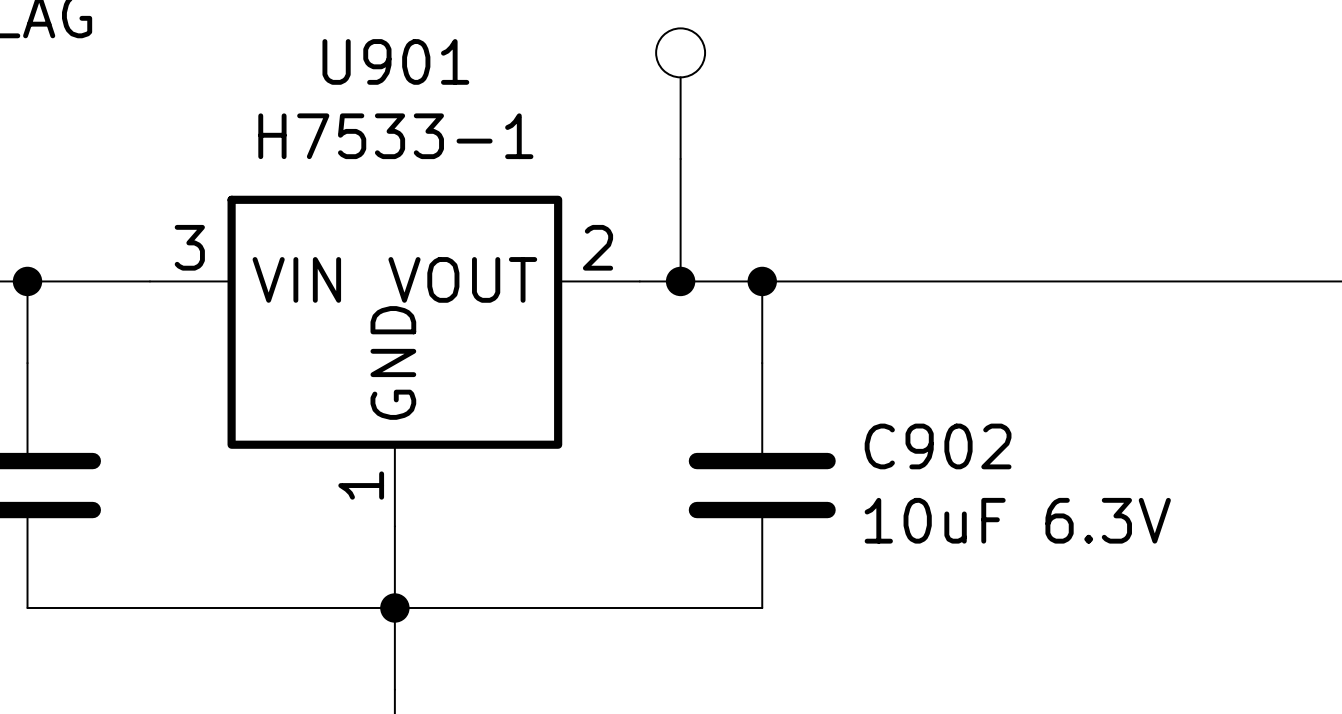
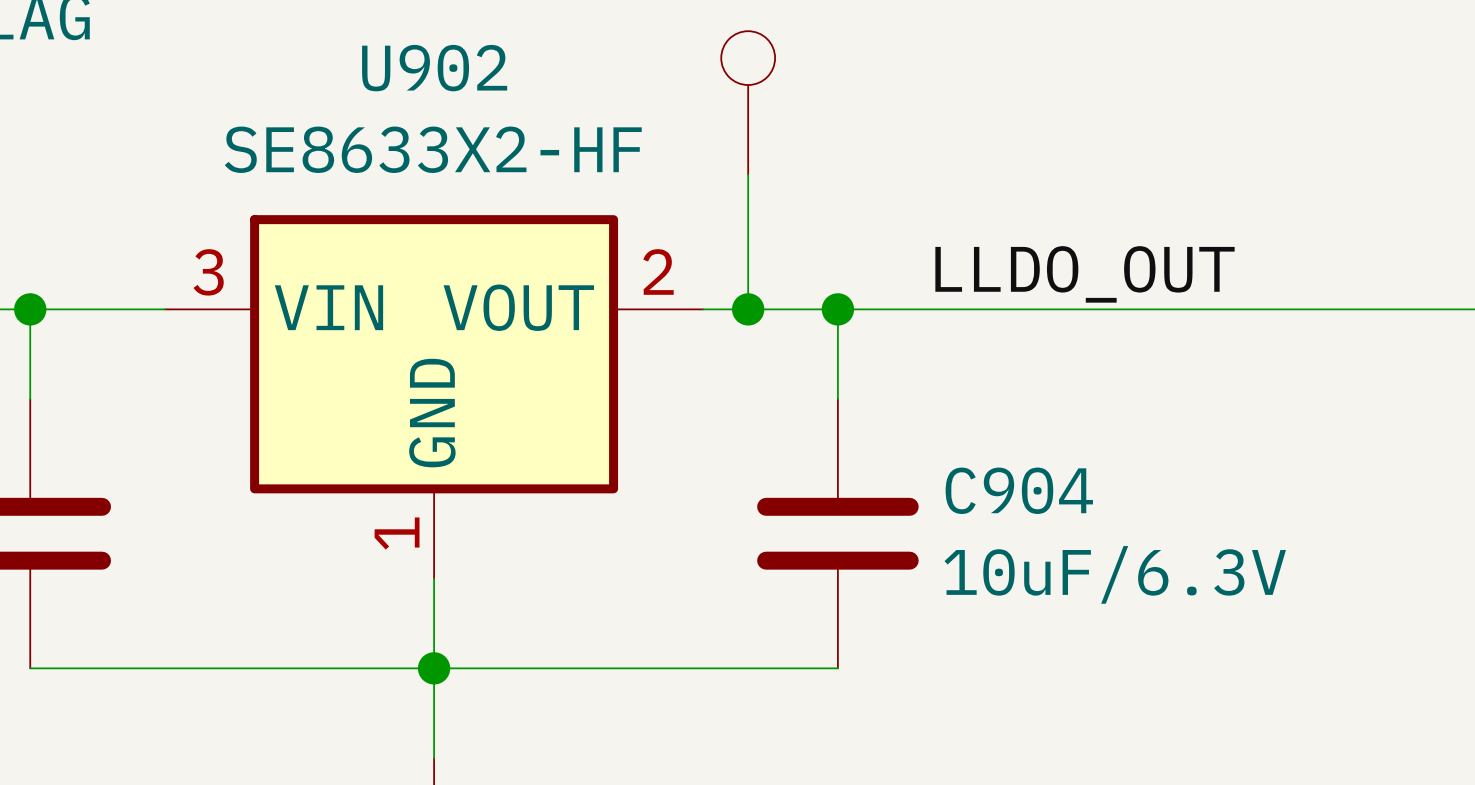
U901 name: U901 (395, 61) -> U902 (434, 68)
U901 value: H7533-1 (395, 136) -> SE8633X2-HF (433, 149)
label: none -> LLDO_OUT (1084, 274)
C902 name: C902 (938, 446) -> C904 (1019, 490)
C902 value: 10uF 6.3V (1017, 520) -> 10uF/6.3V (1115, 574)

